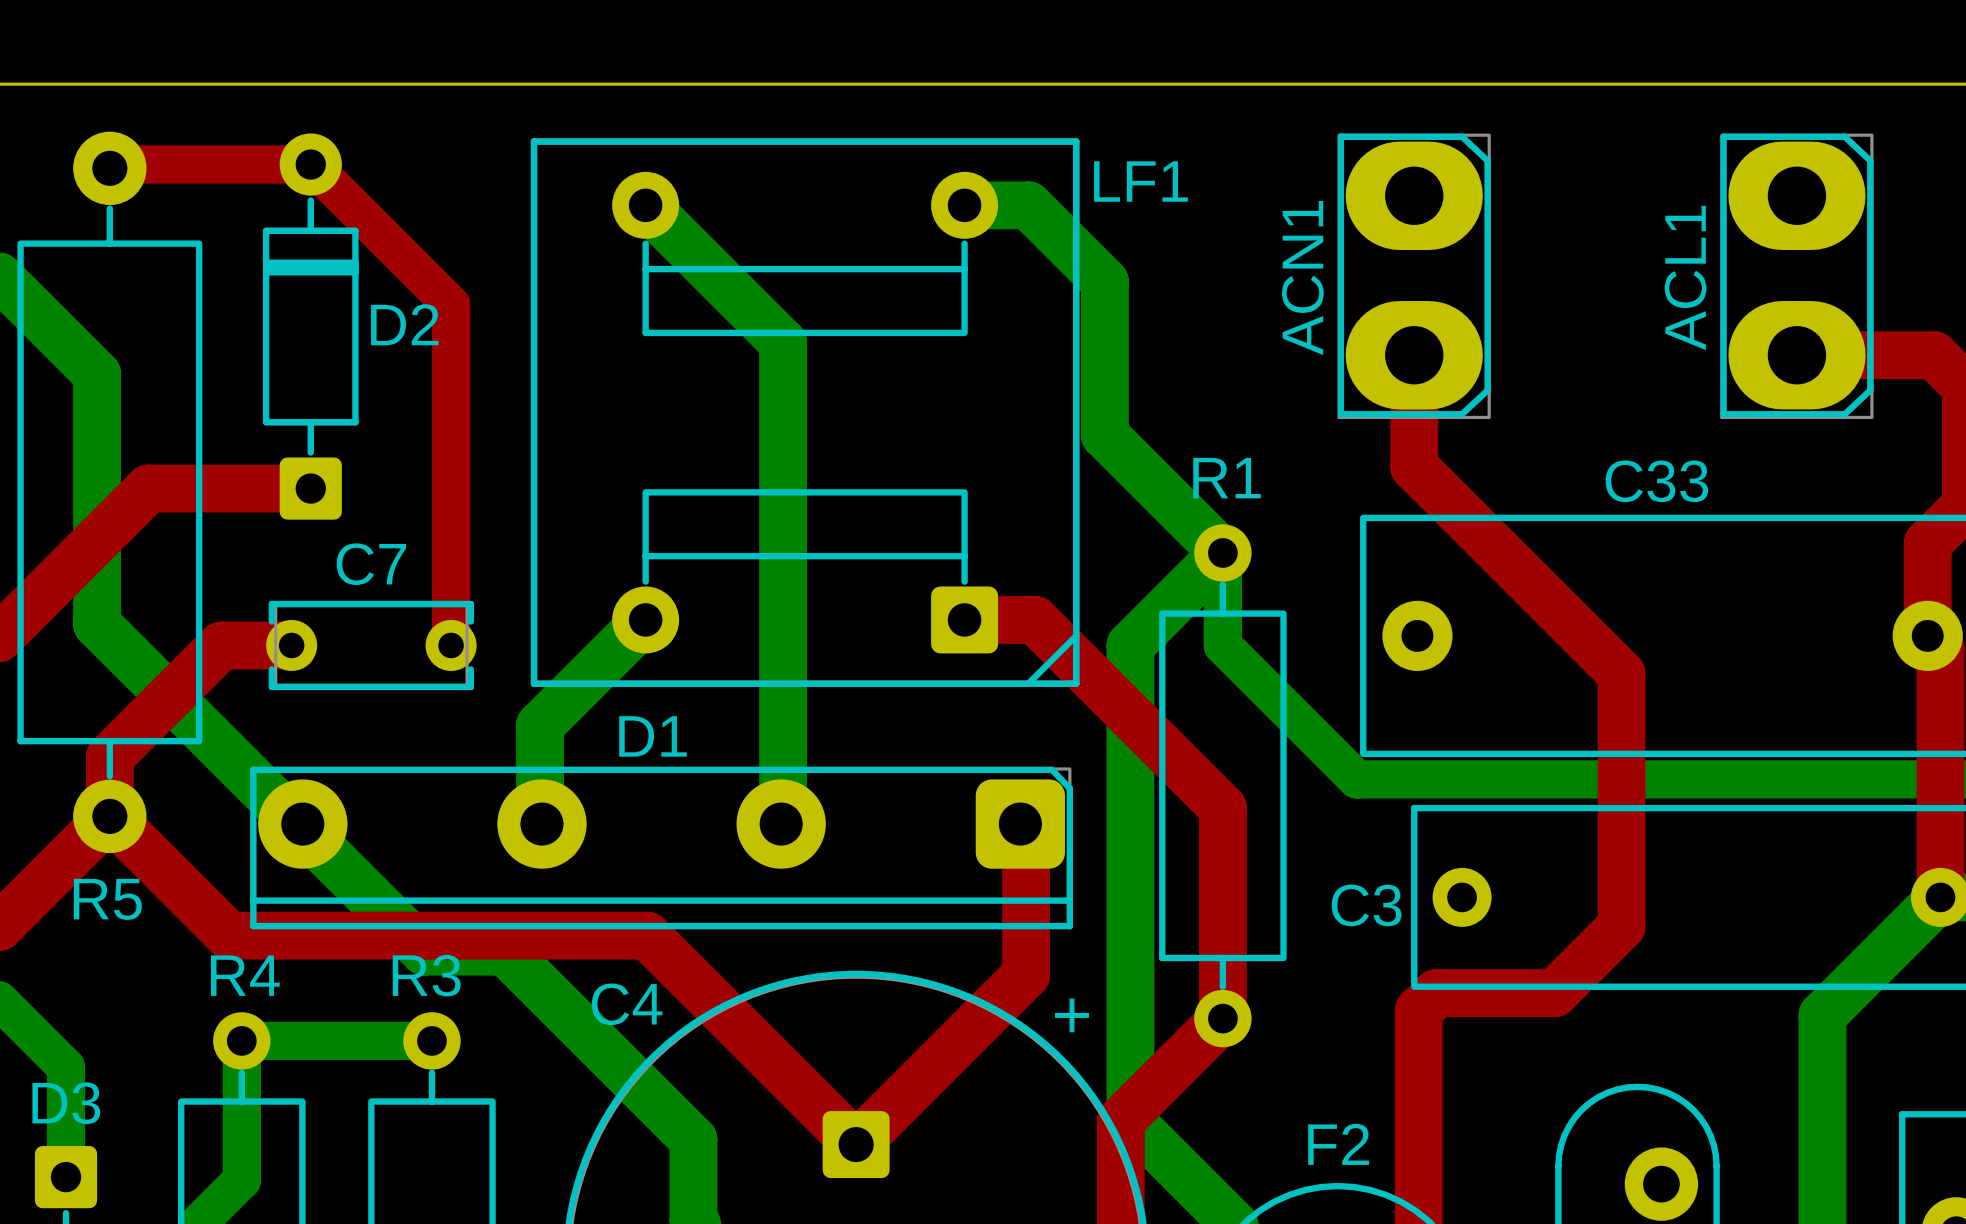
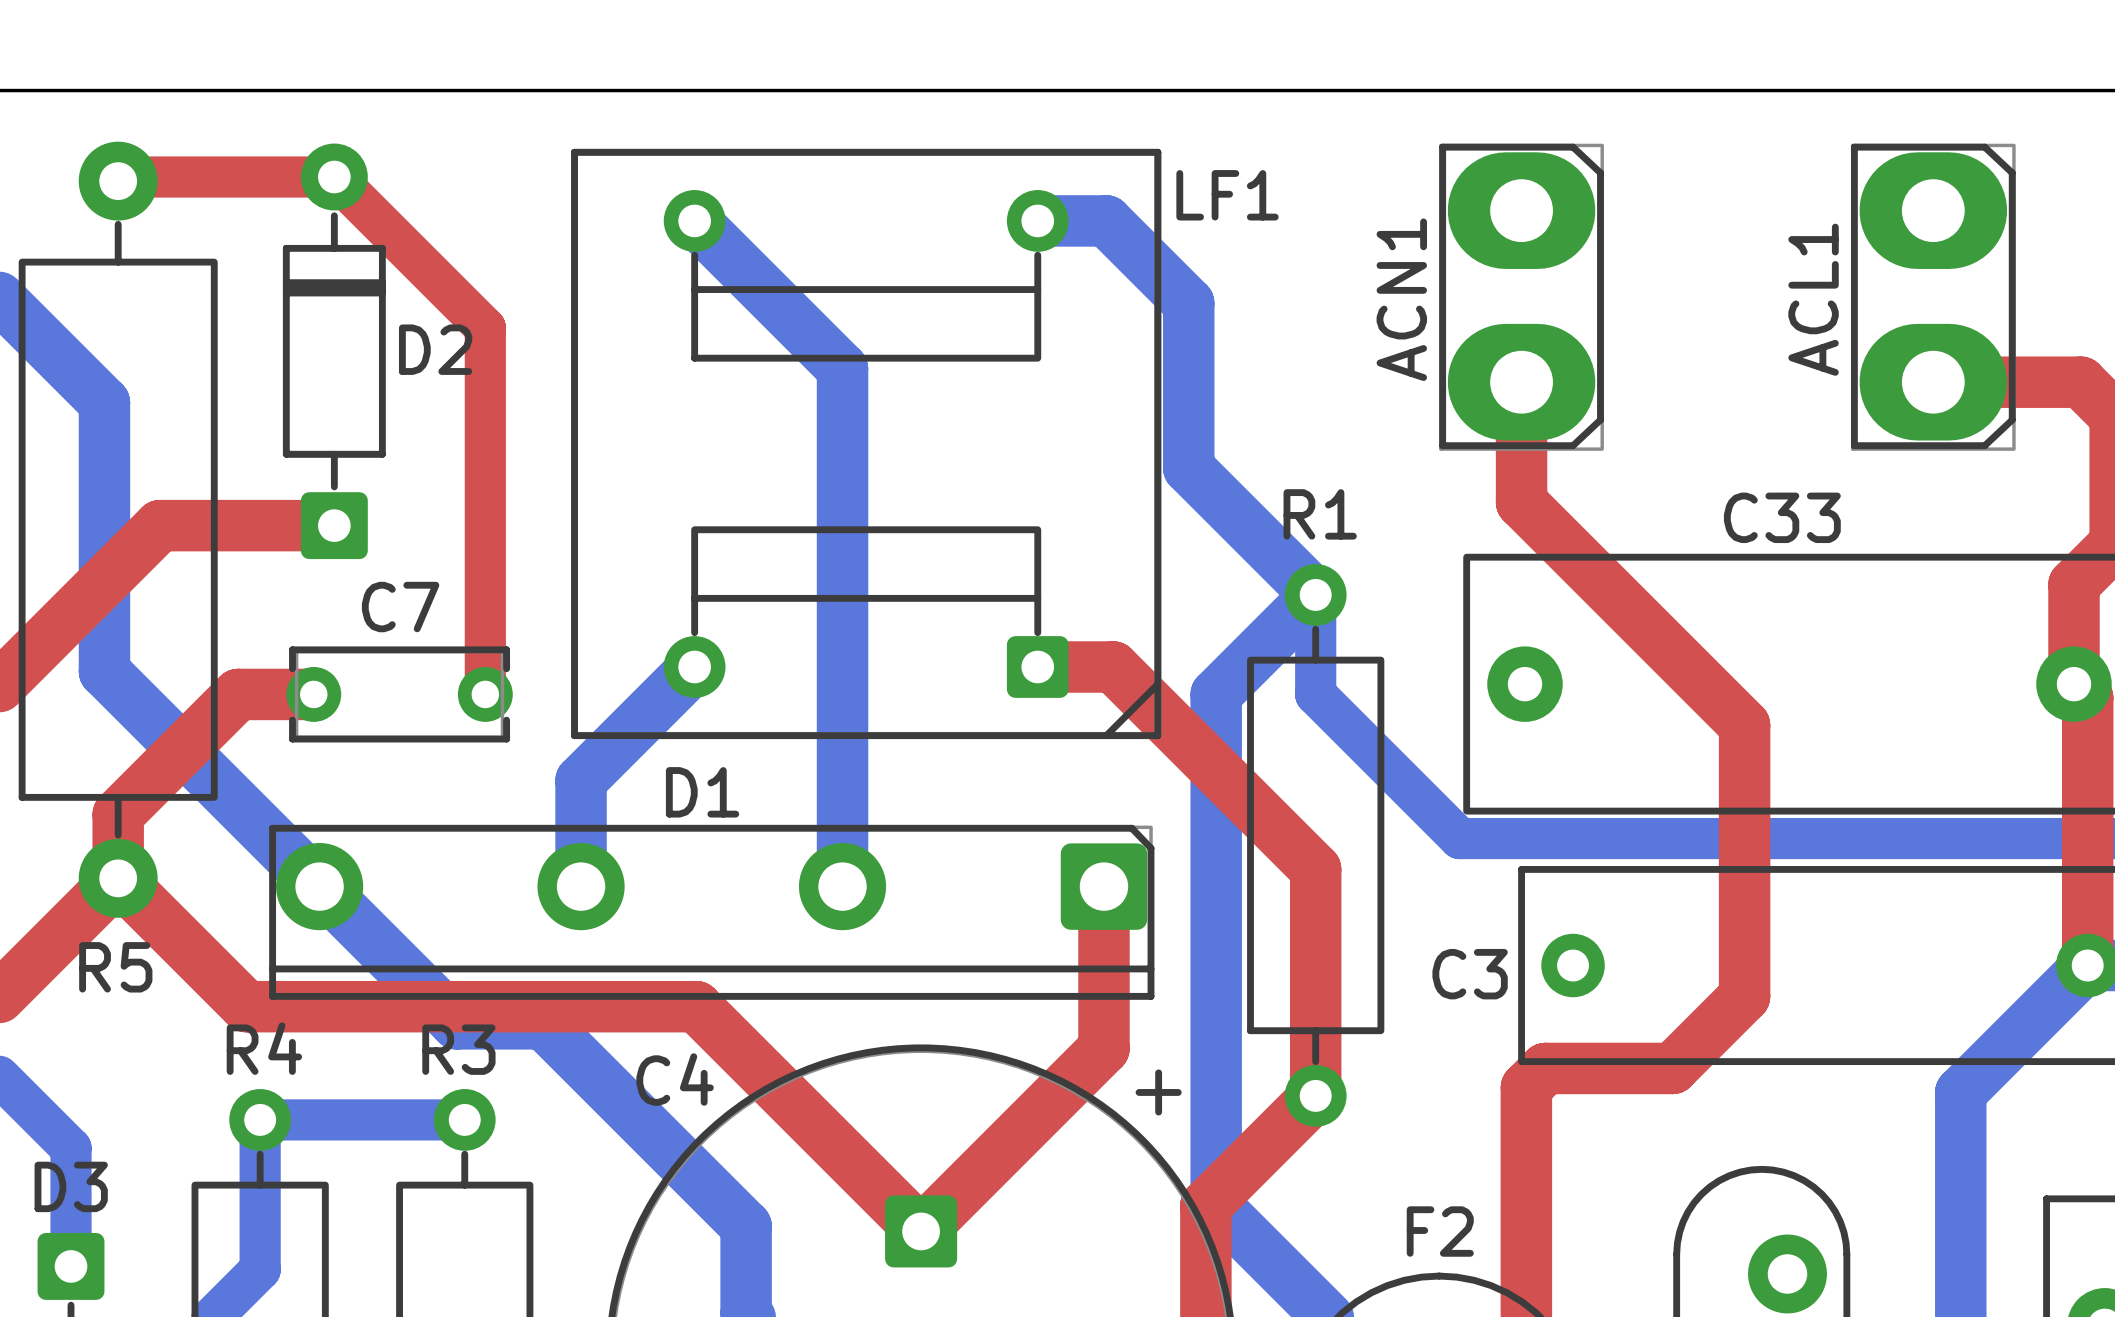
LF1 footprint: [530, 138, 1080, 687] -> [571, 148, 1162, 740]
D1 footprint: [250, 766, 1074, 930] -> [269, 824, 1155, 1000]

